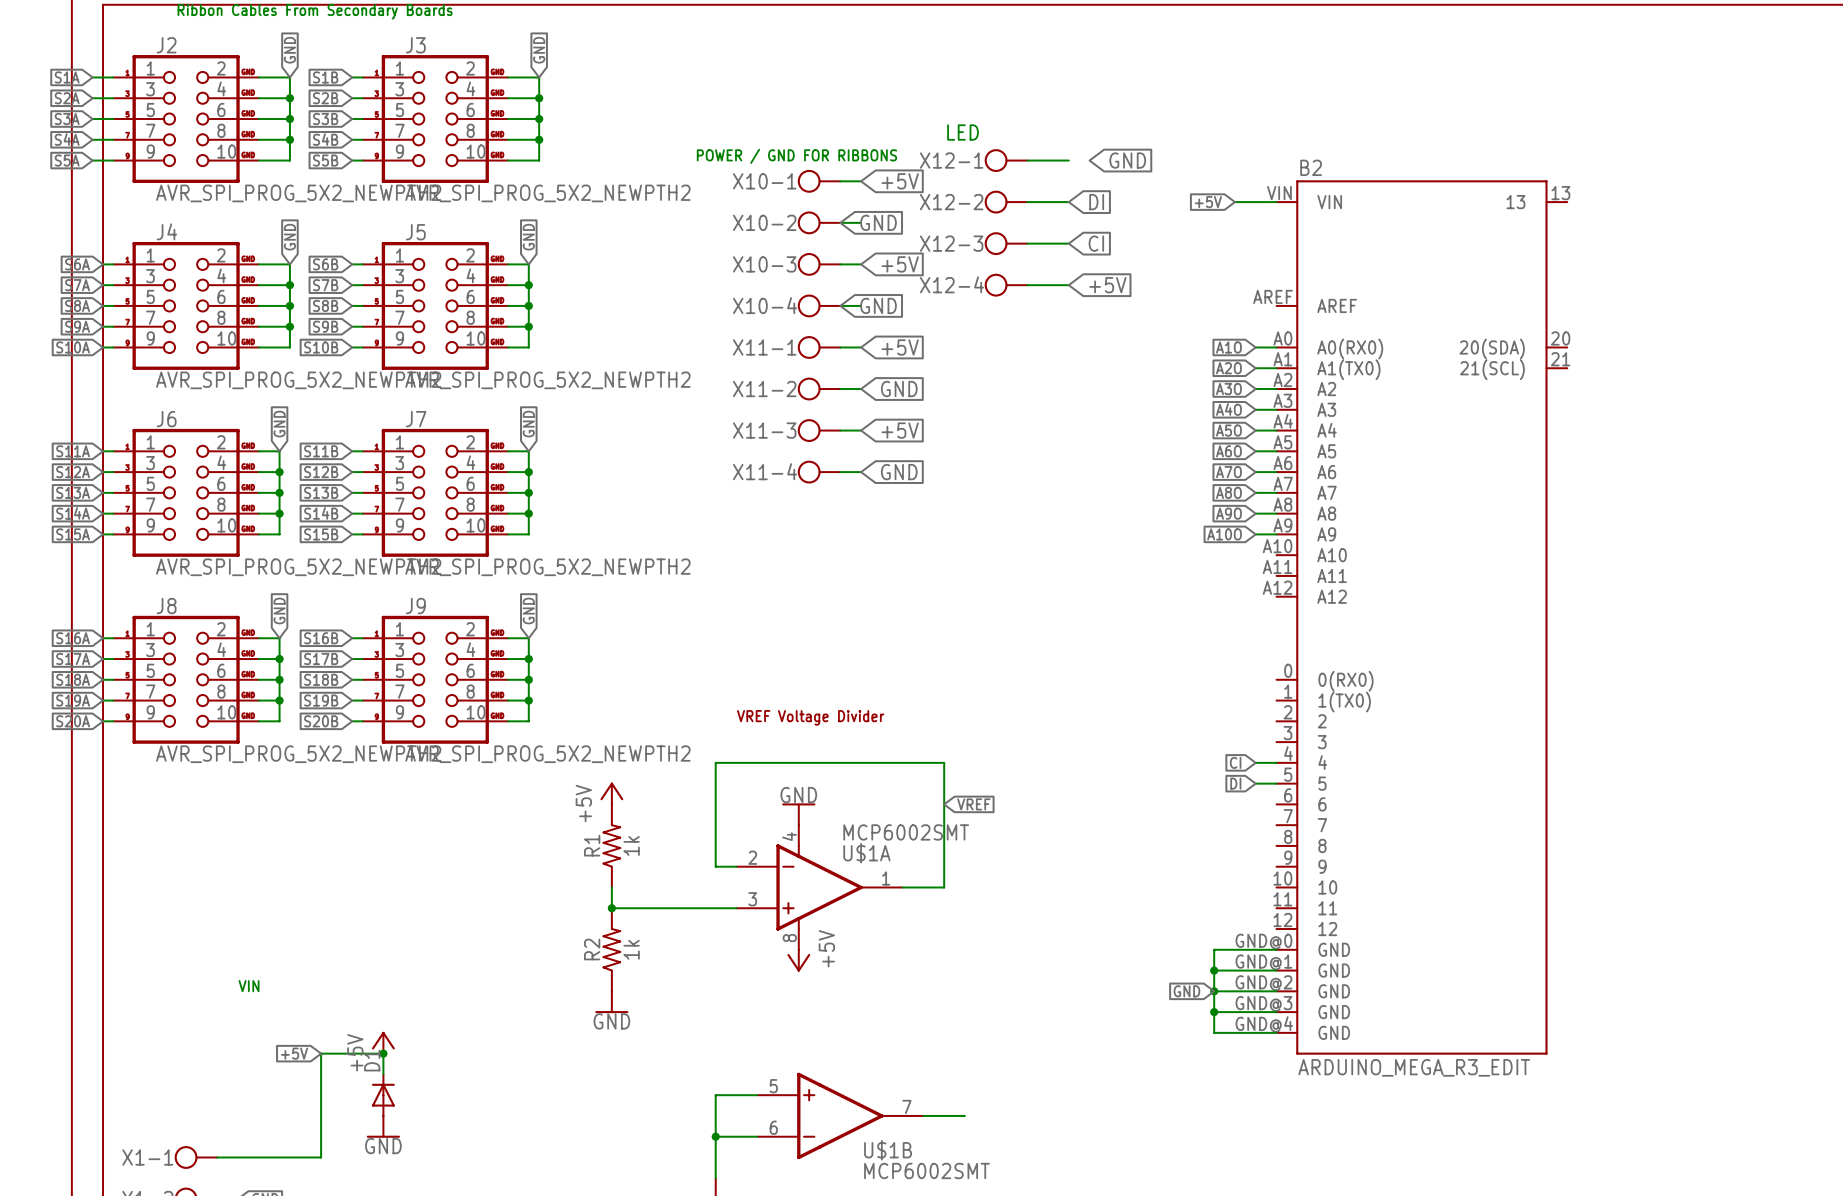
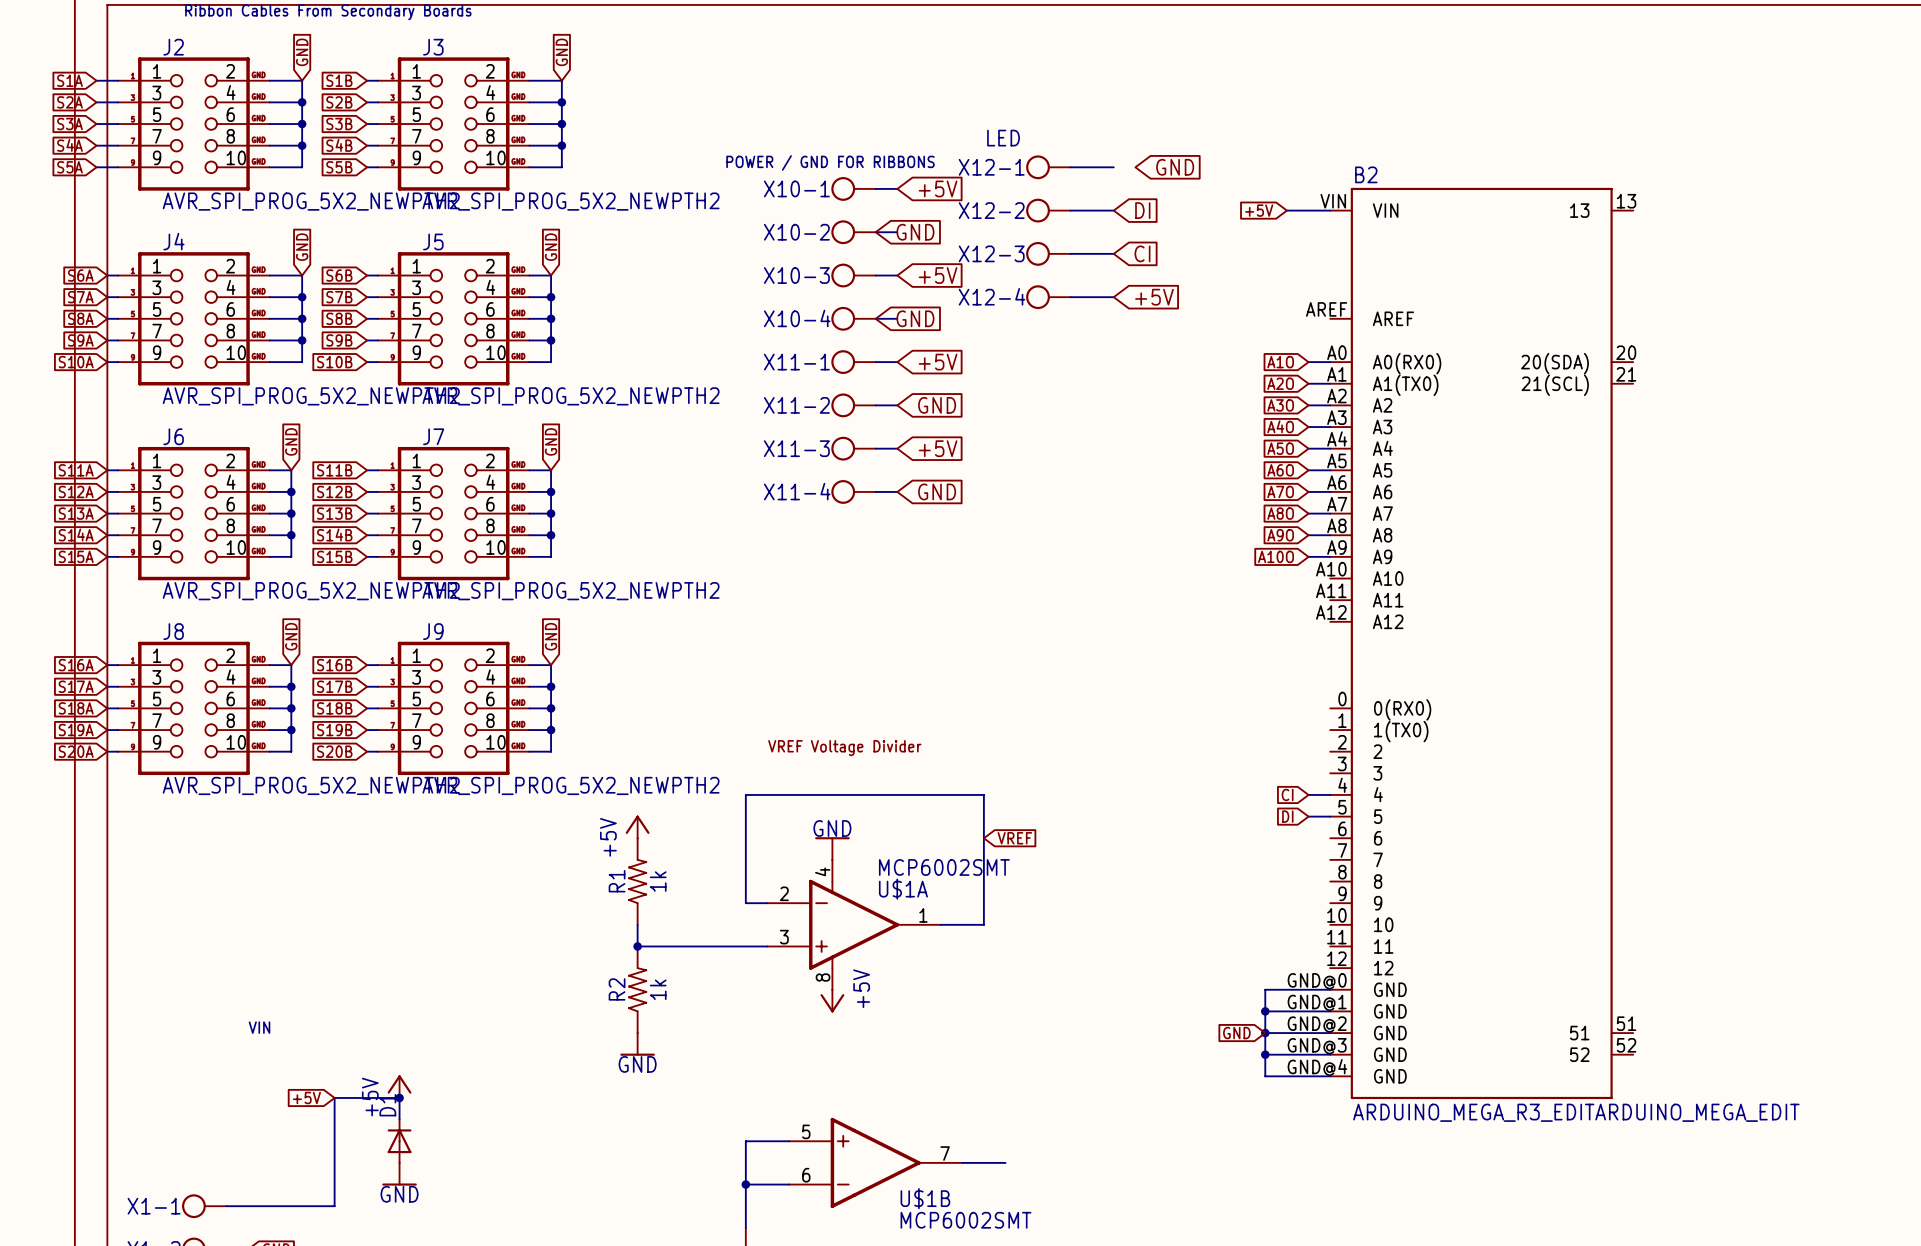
B2 symbol: [1276, 180, 1568, 1055] -> [1330, 187, 1634, 1100]
B2 value: ARDUINO_MEGA_R3_EDIT (1414, 1067) -> ARDUINO_MEGA_R3_EDITARDUINO_MEGA_EDIT (1576, 1112)

